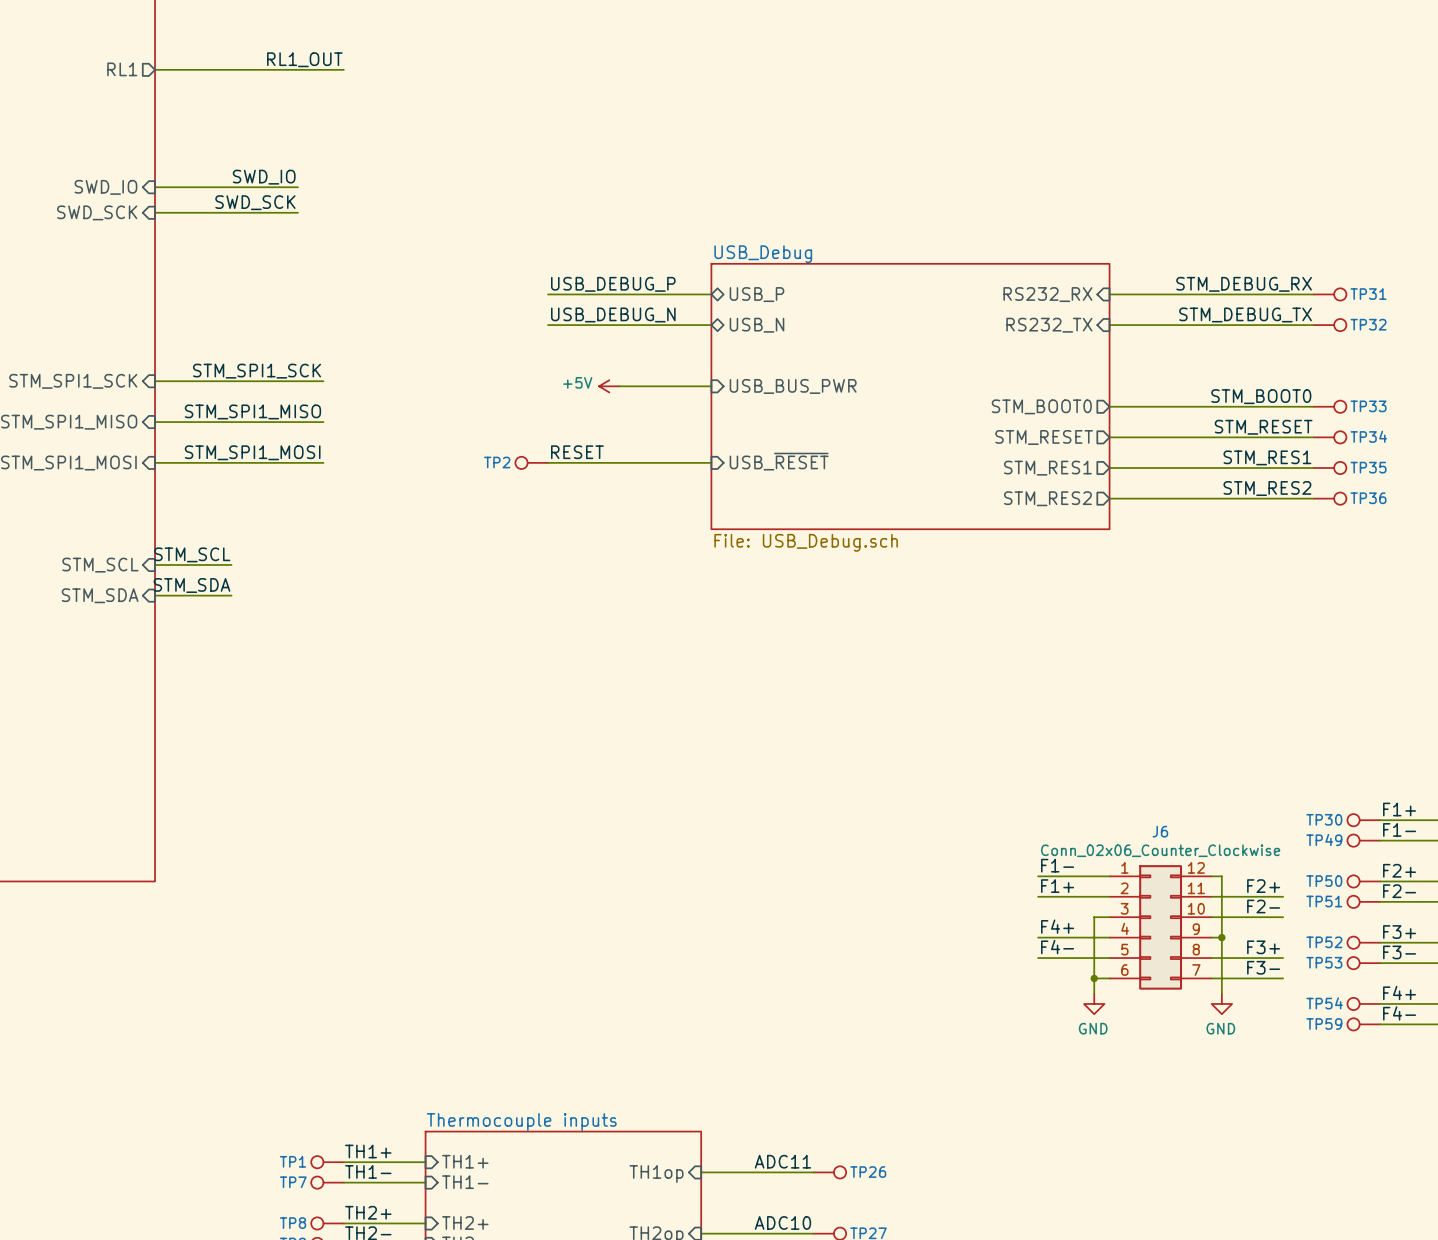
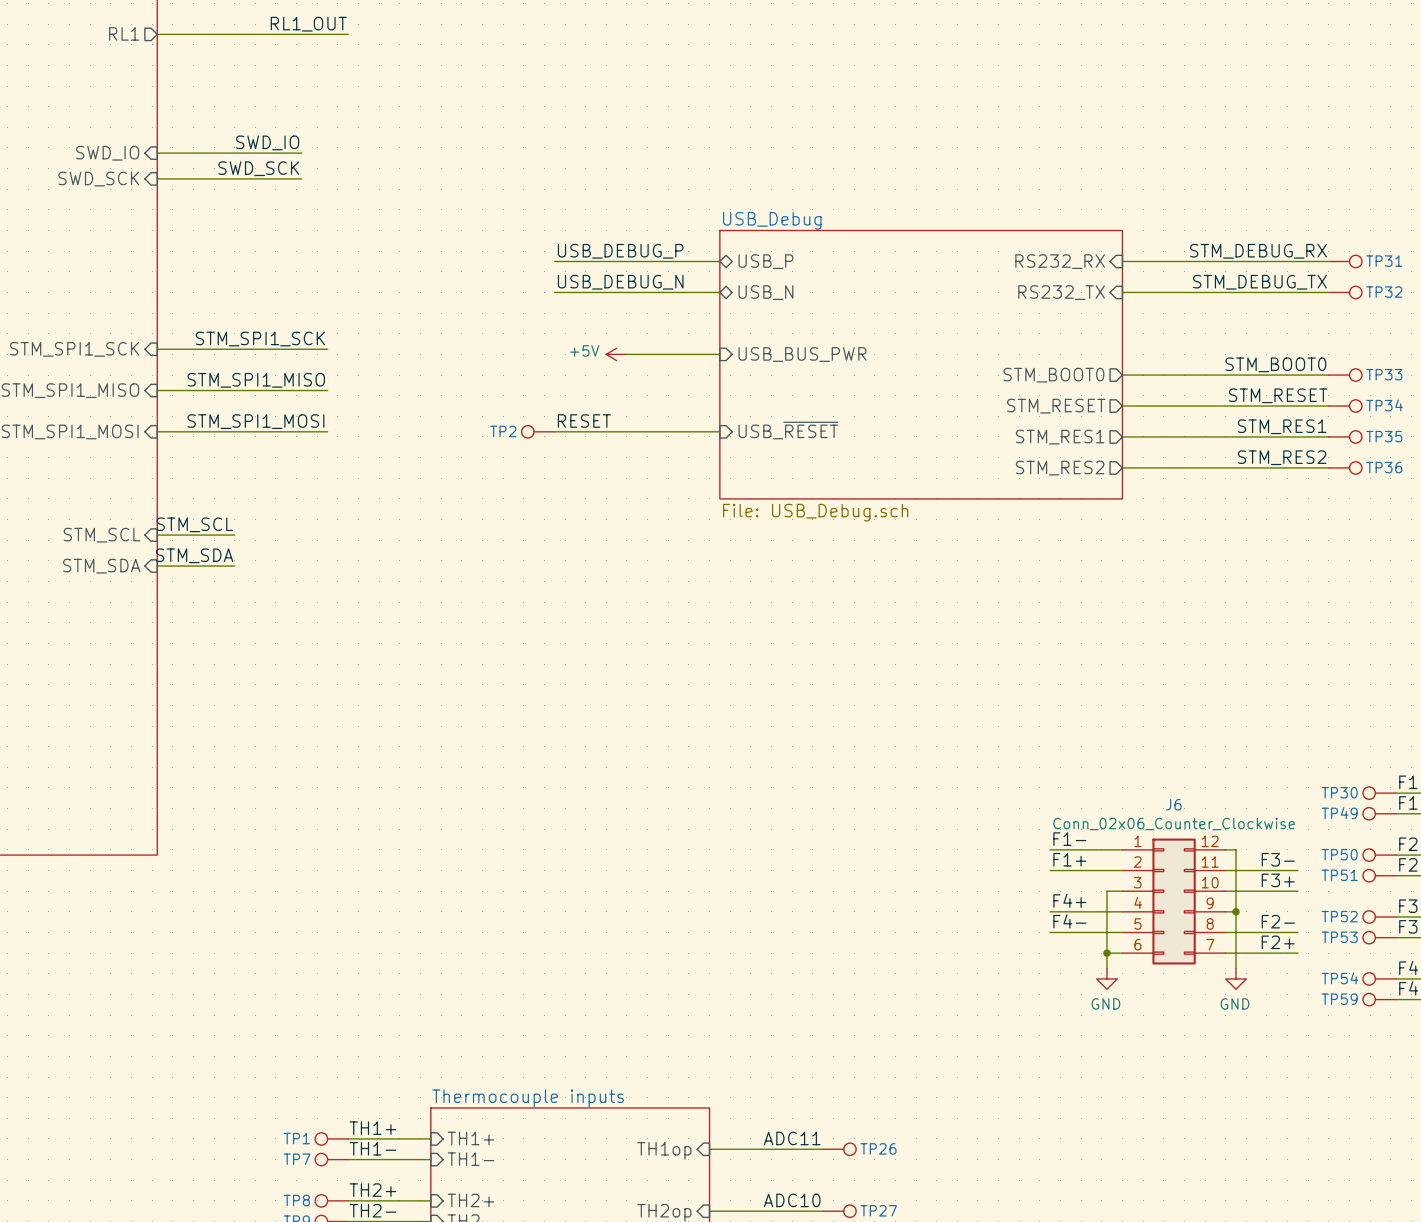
label: F2+ (1263, 886) -> F3- (1278, 859)
label: F2- (1263, 906) -> F3+ (1278, 880)
label: F3+ (1263, 947) -> F2- (1278, 921)
label: F3- (1263, 967) -> F2+ (1278, 942)

